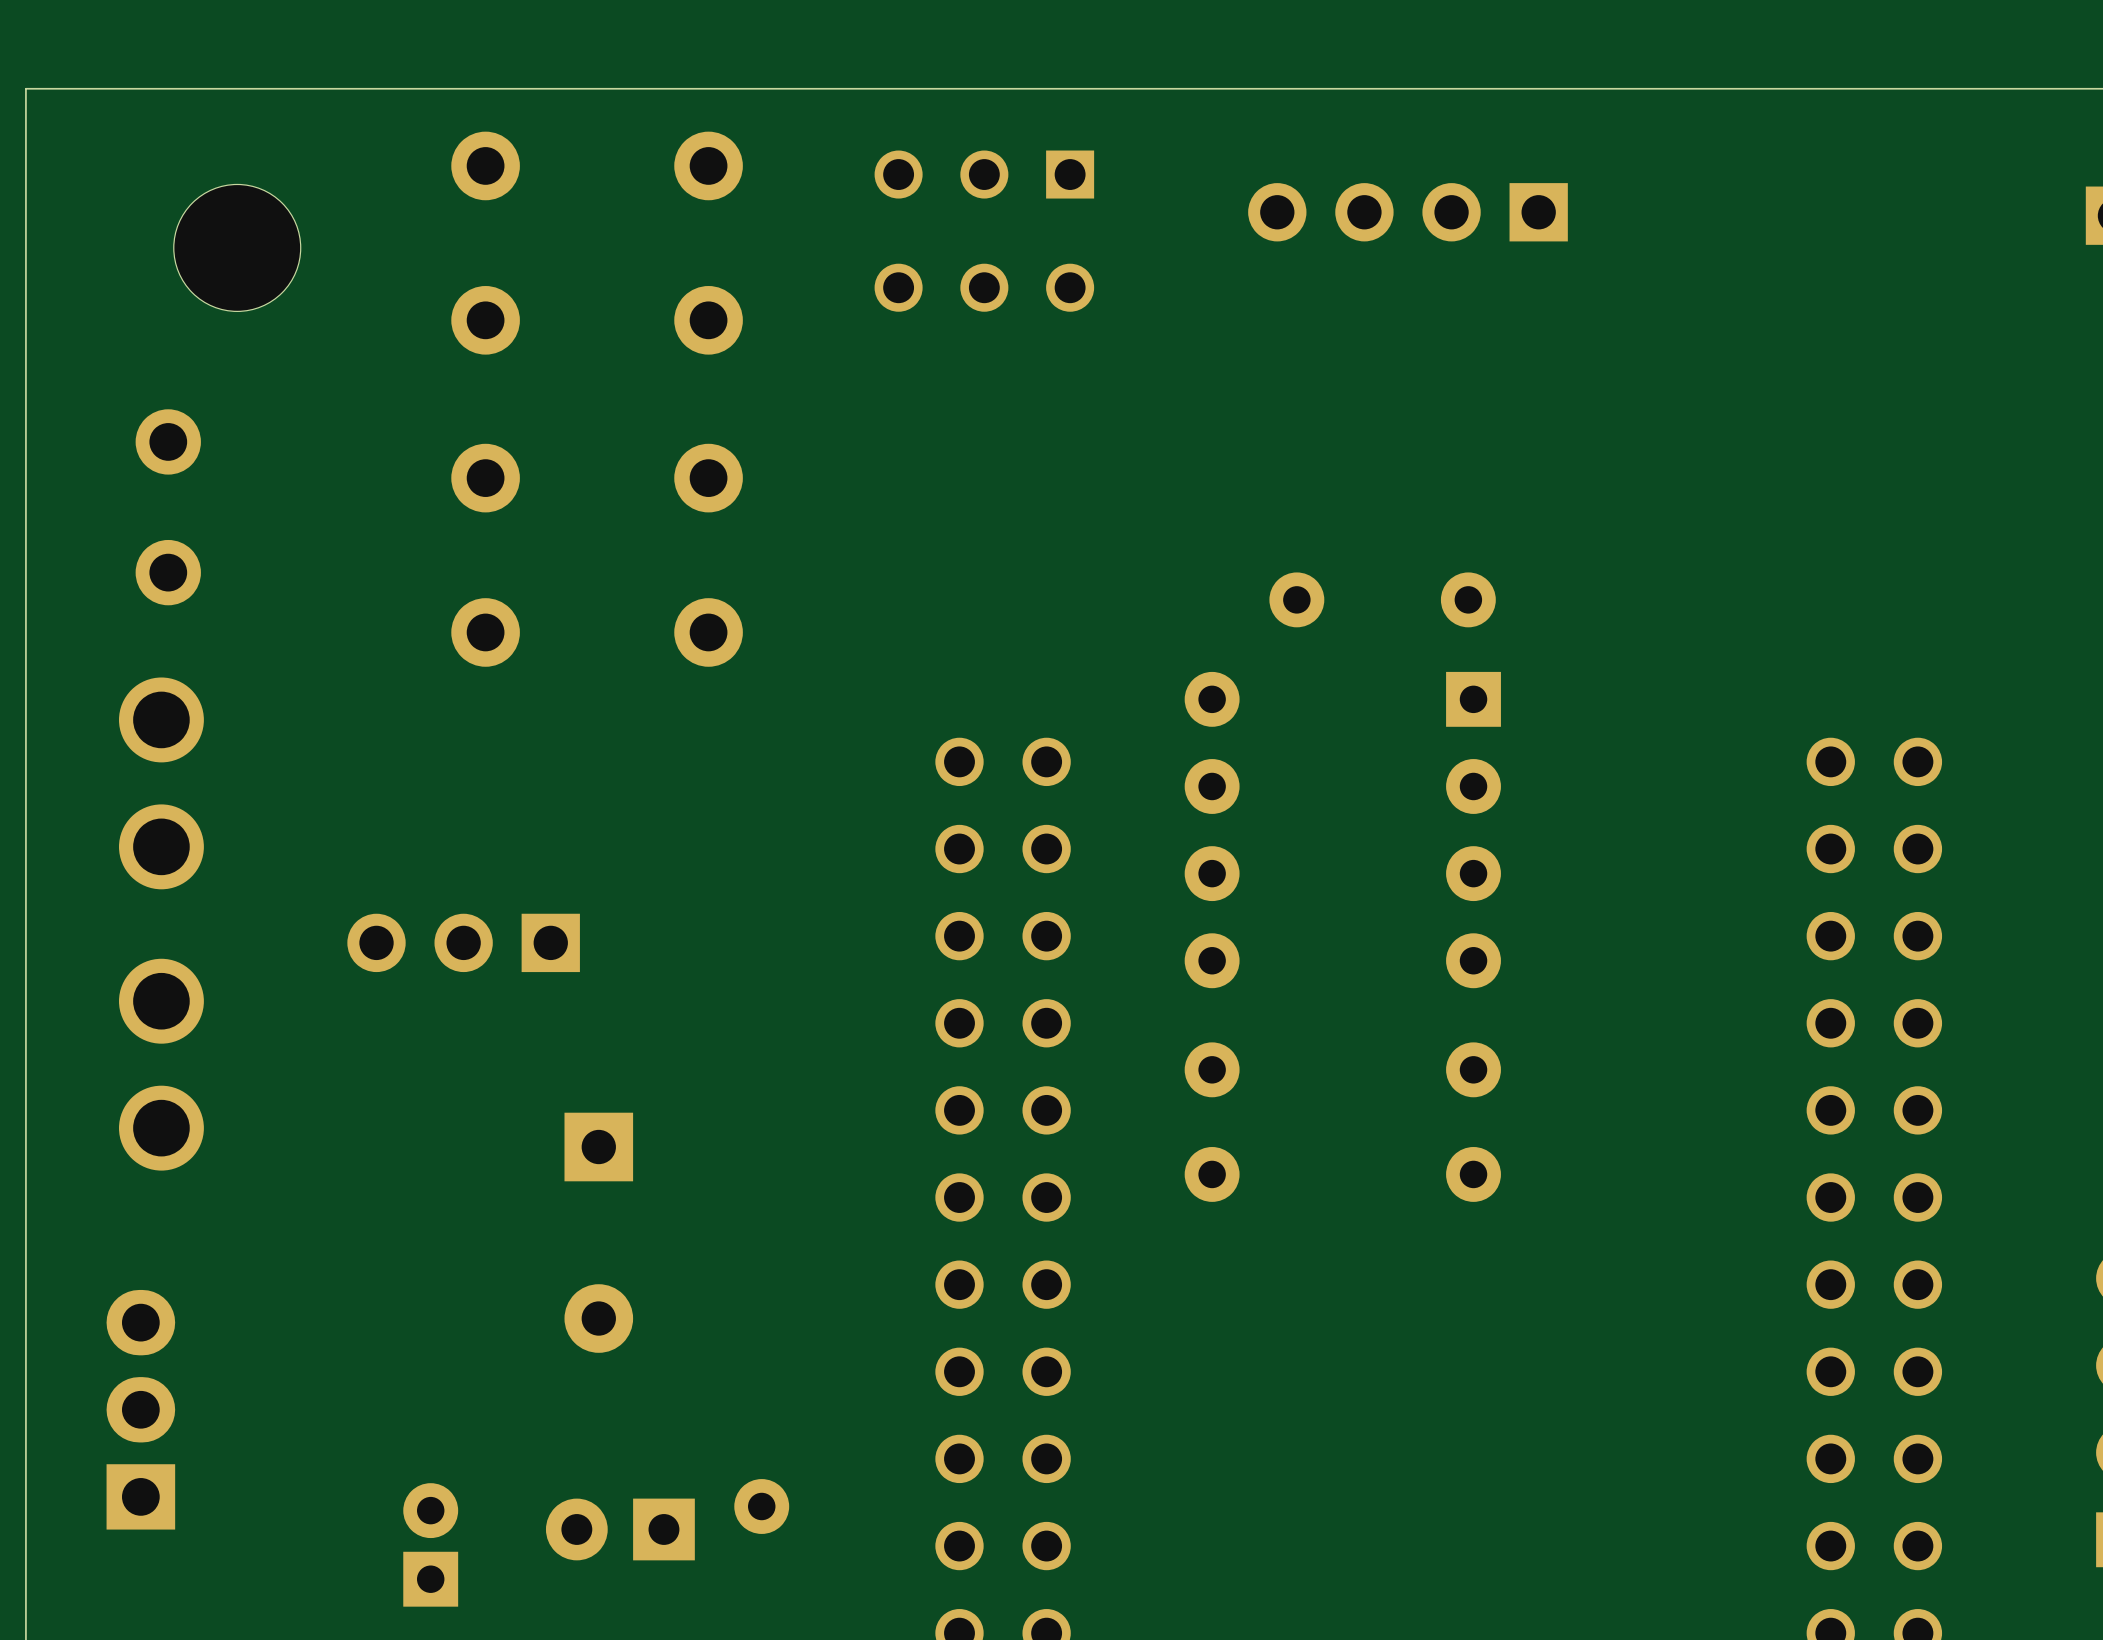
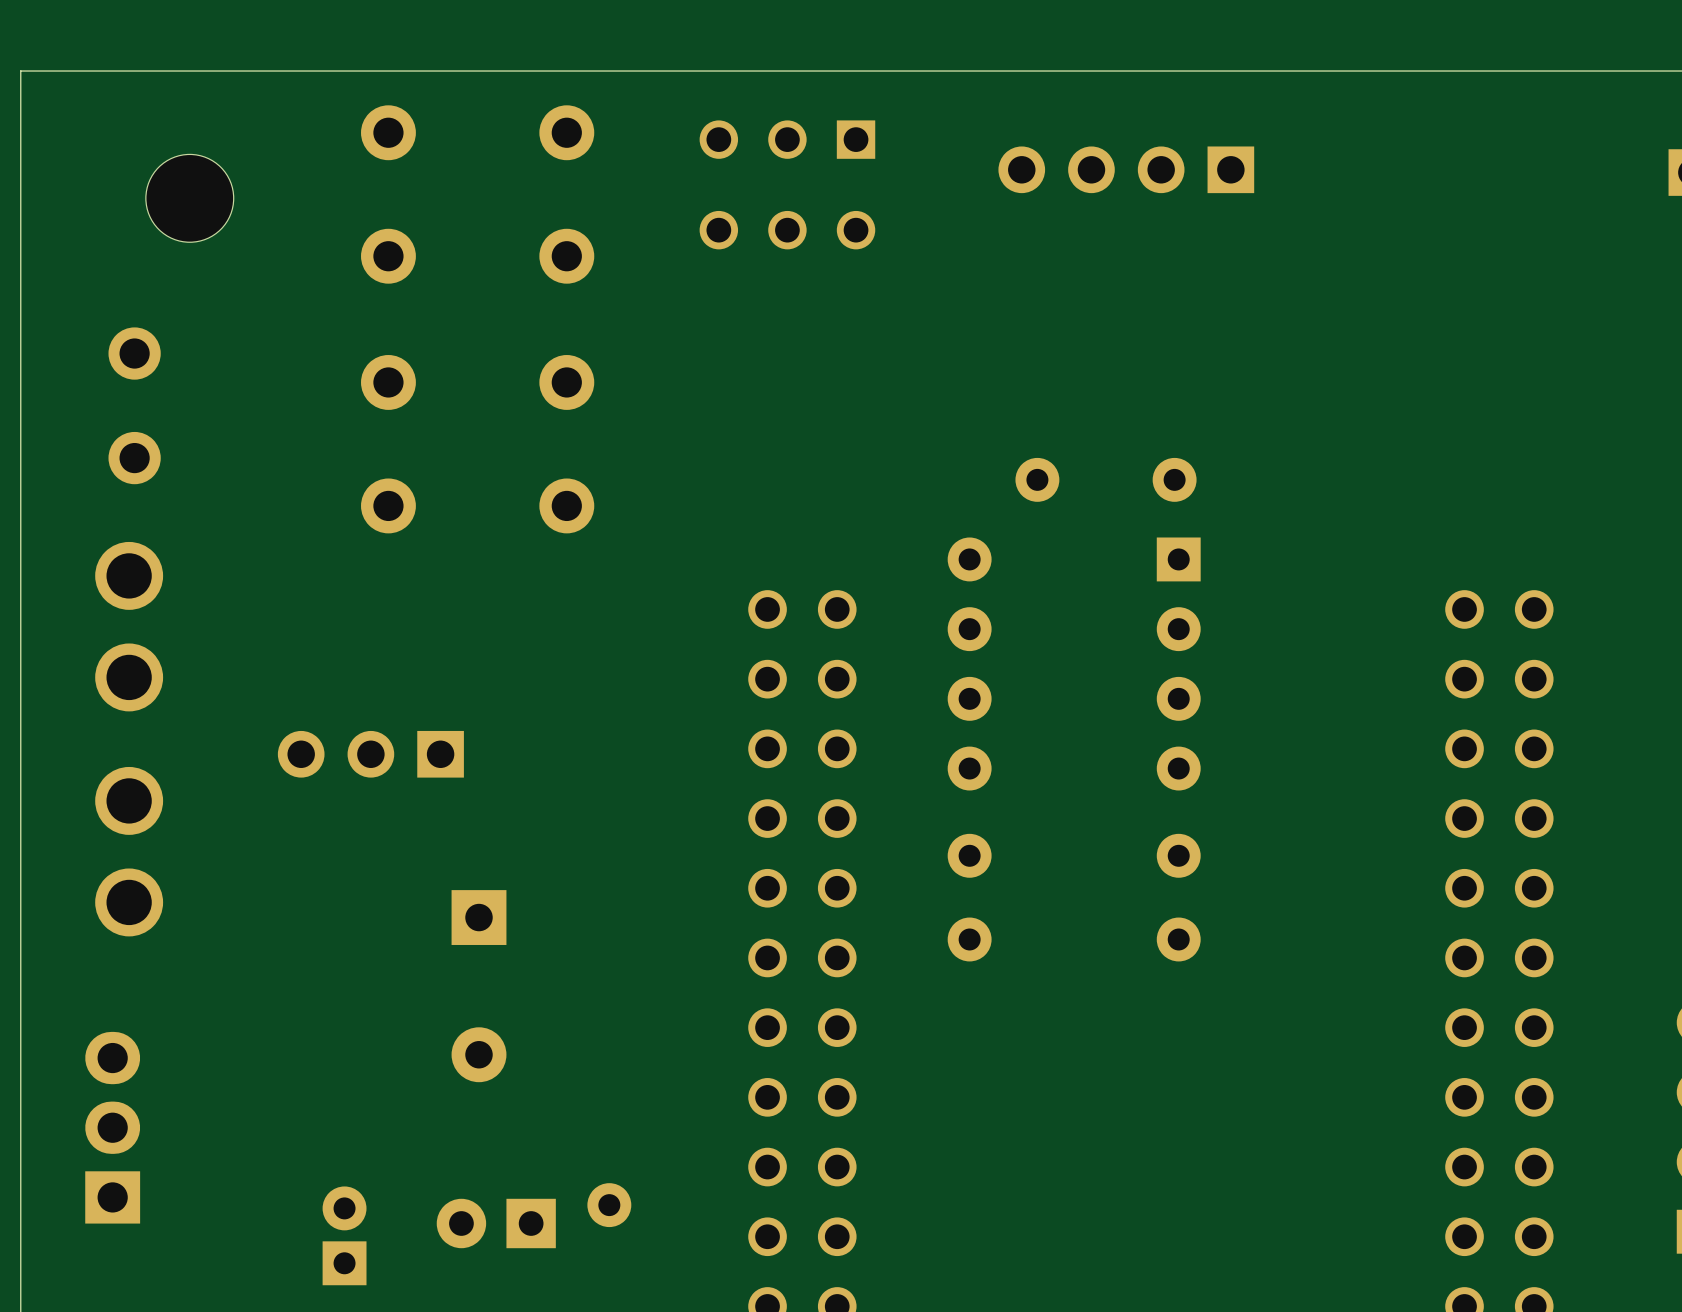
part footprint: [173, 184, 301, 312] -> [145, 154, 234, 243]

